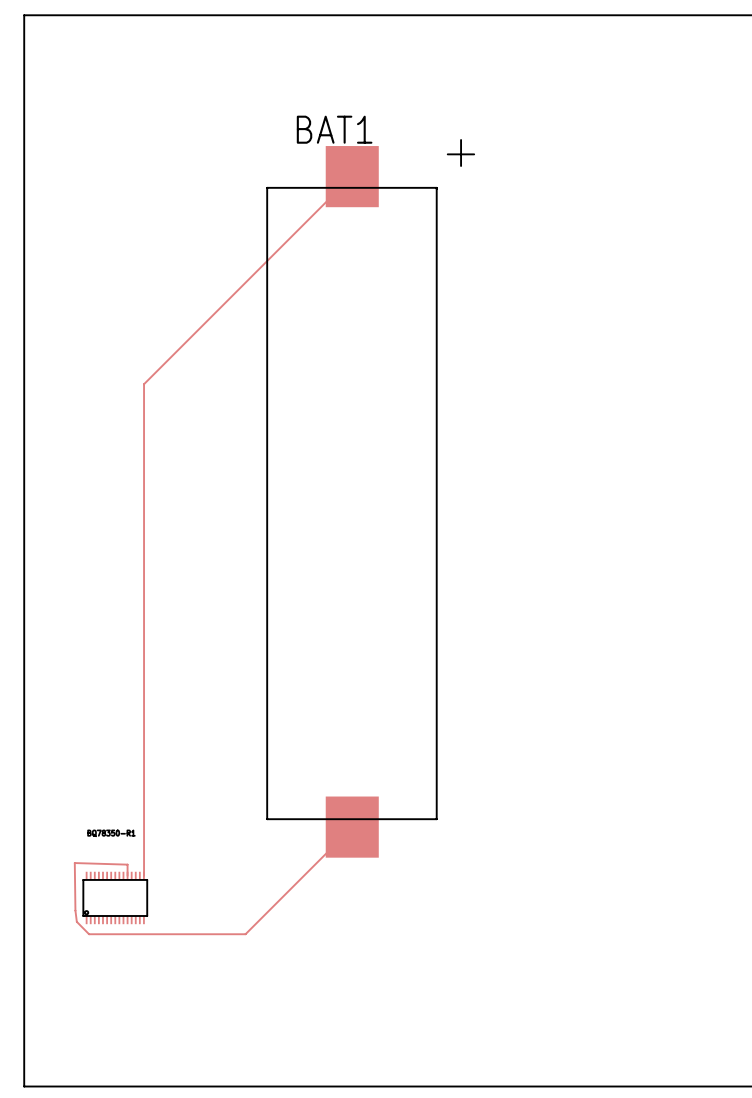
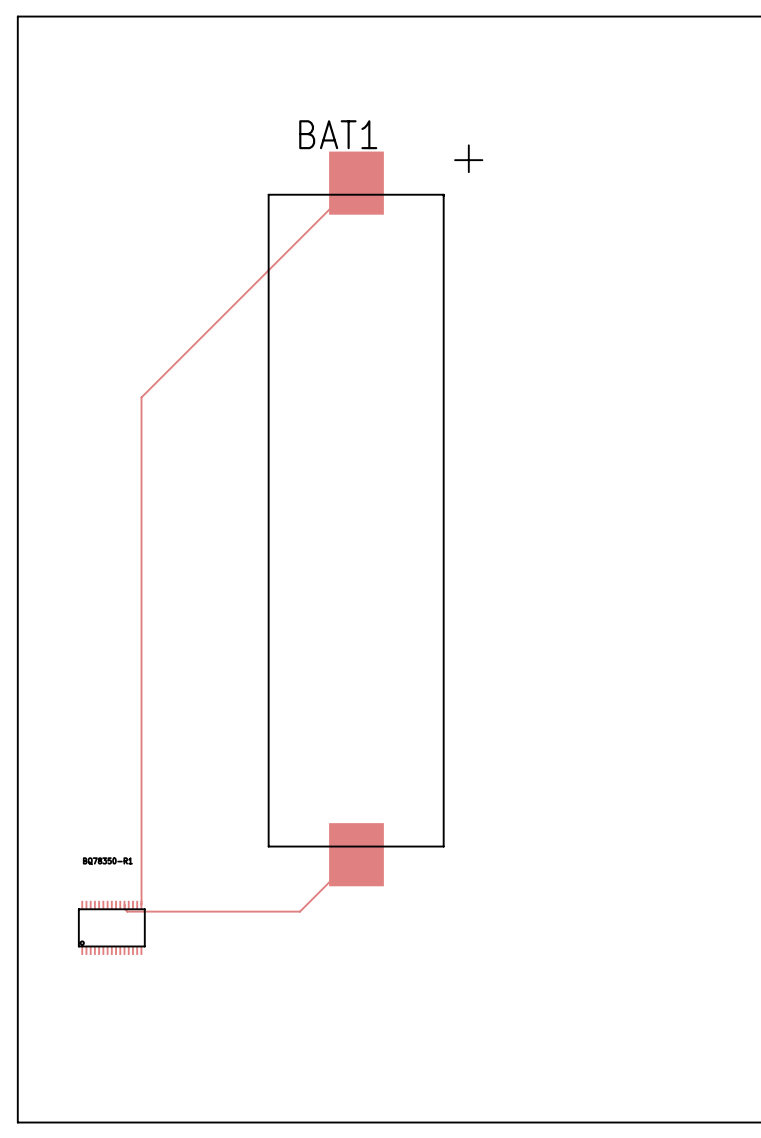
top track: (127, 875) (127, 864) (74, 863) (76, 921) (89, 934) (245, 934) (297, 882) -> (124, 905) (127, 911) (300, 911)

